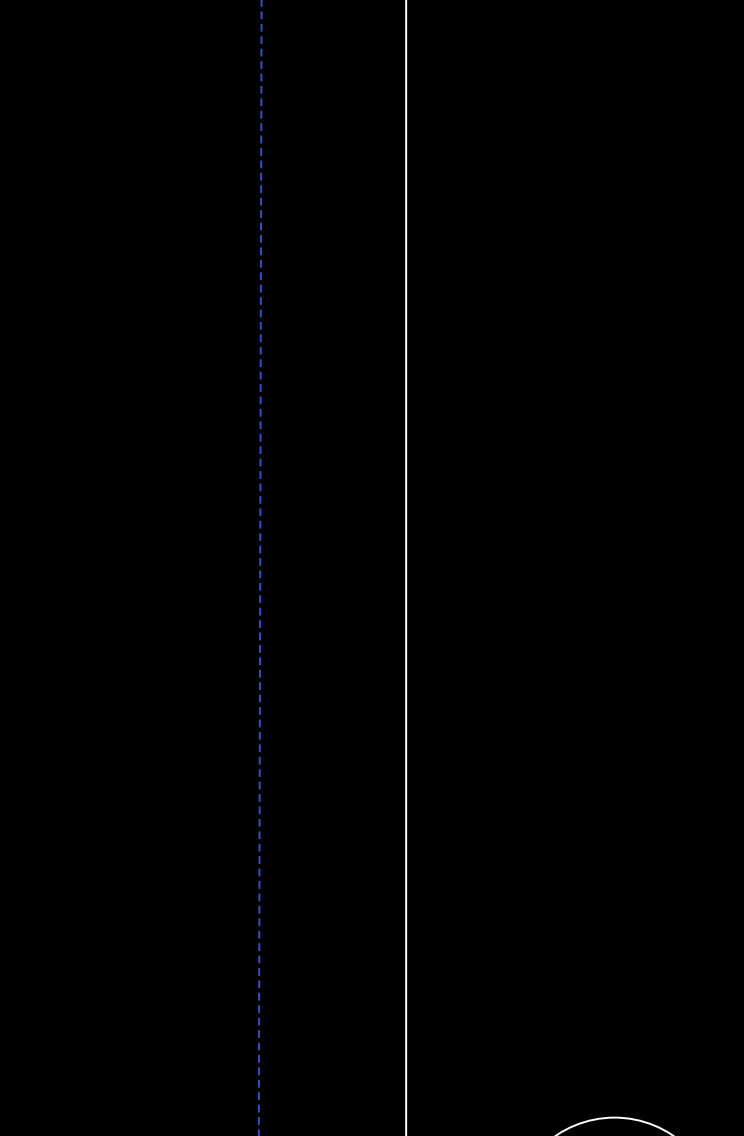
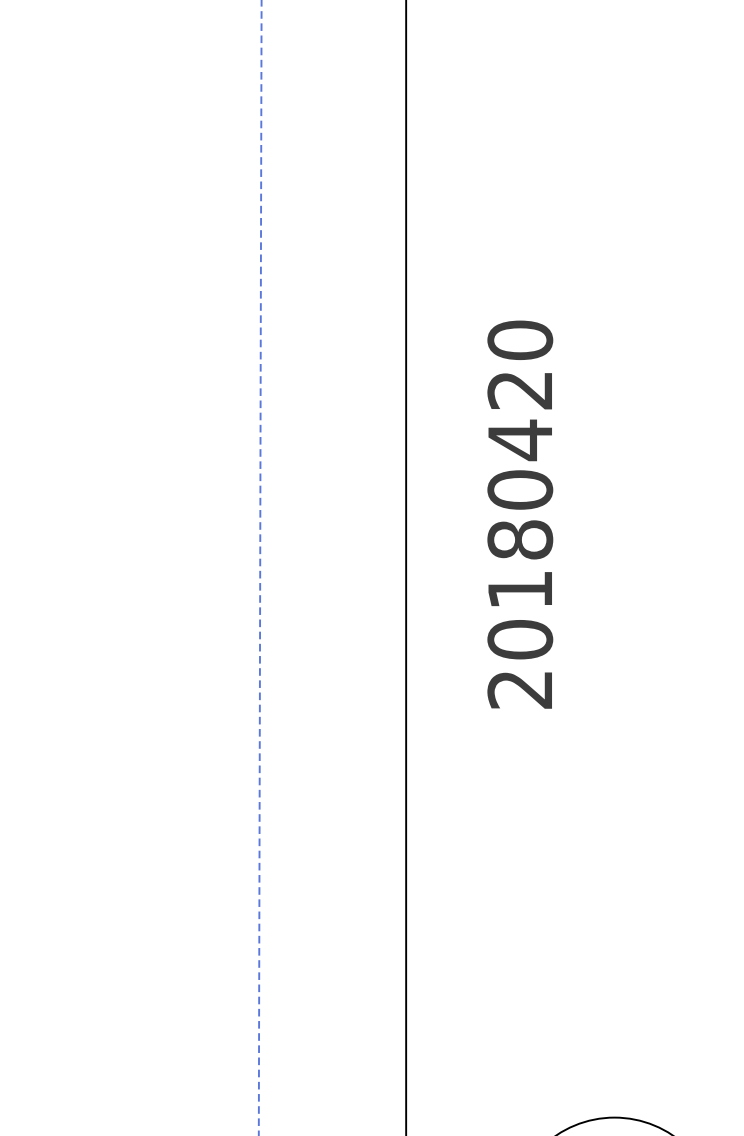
text: none -> 20180420 (520, 514)

